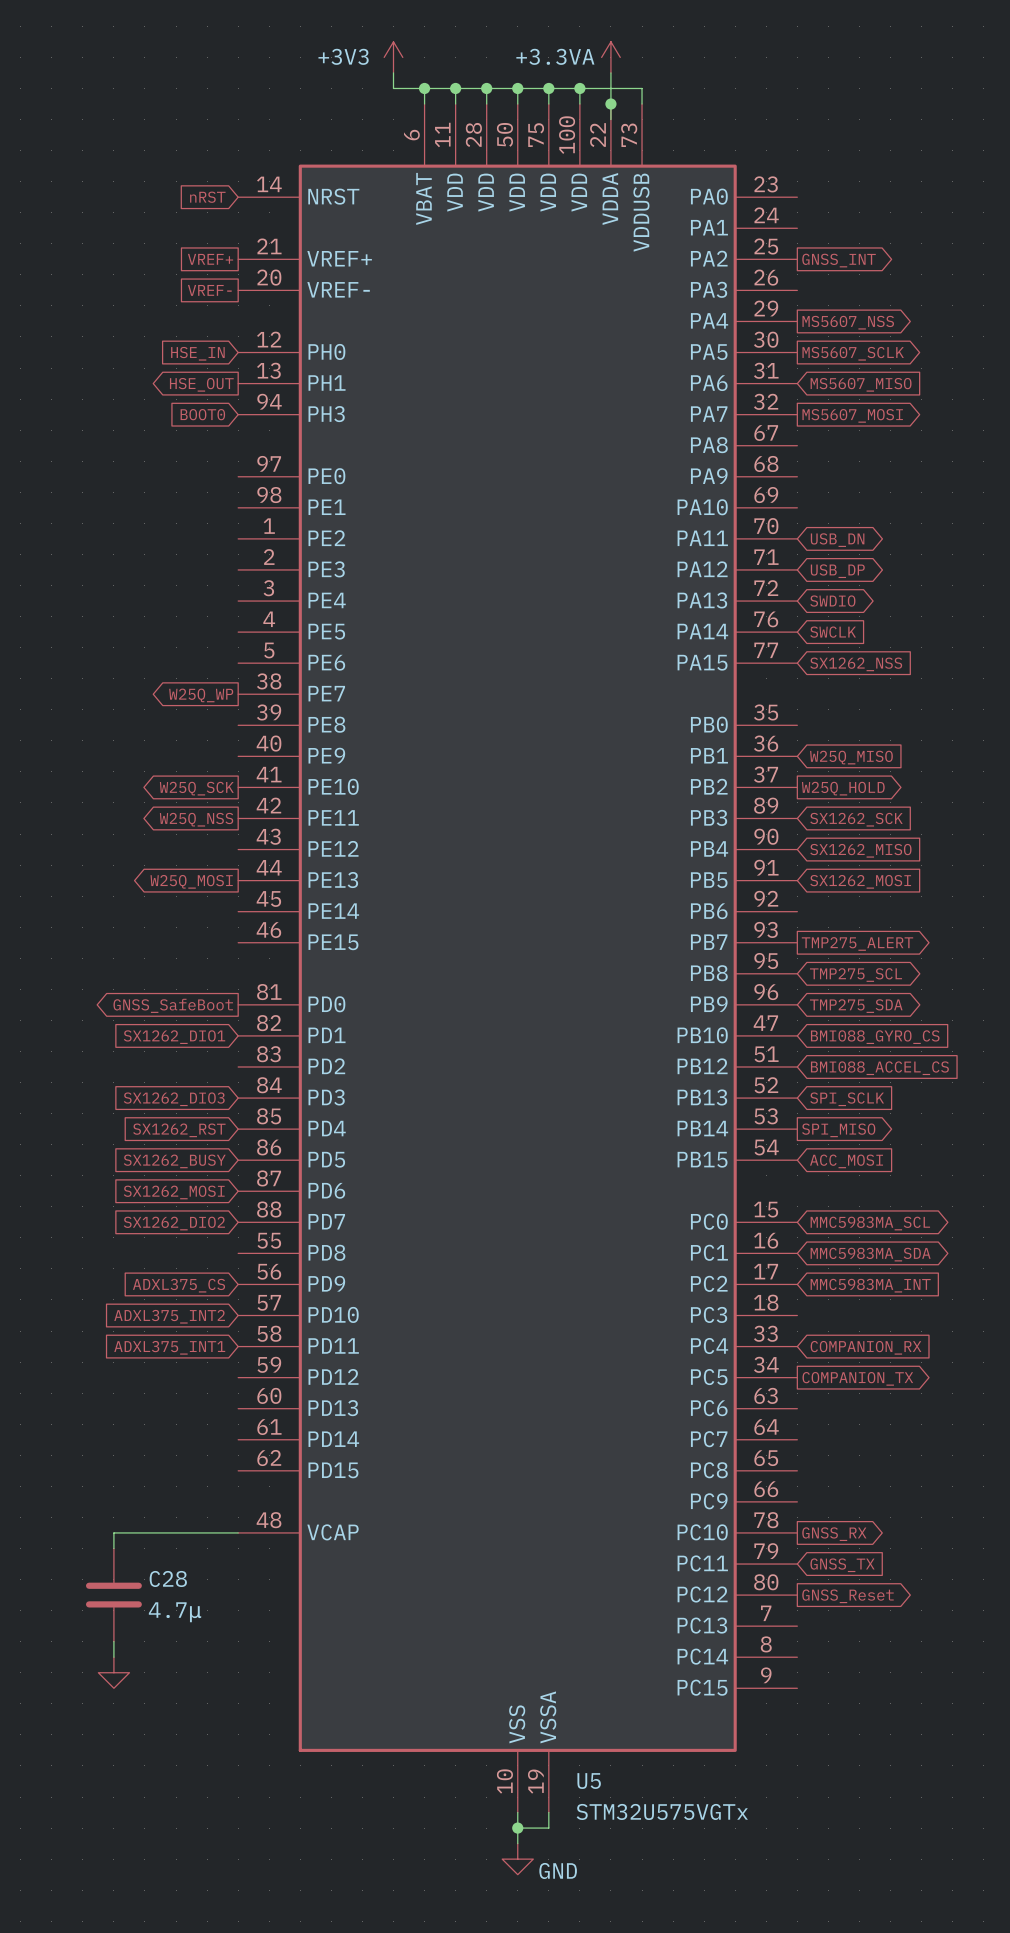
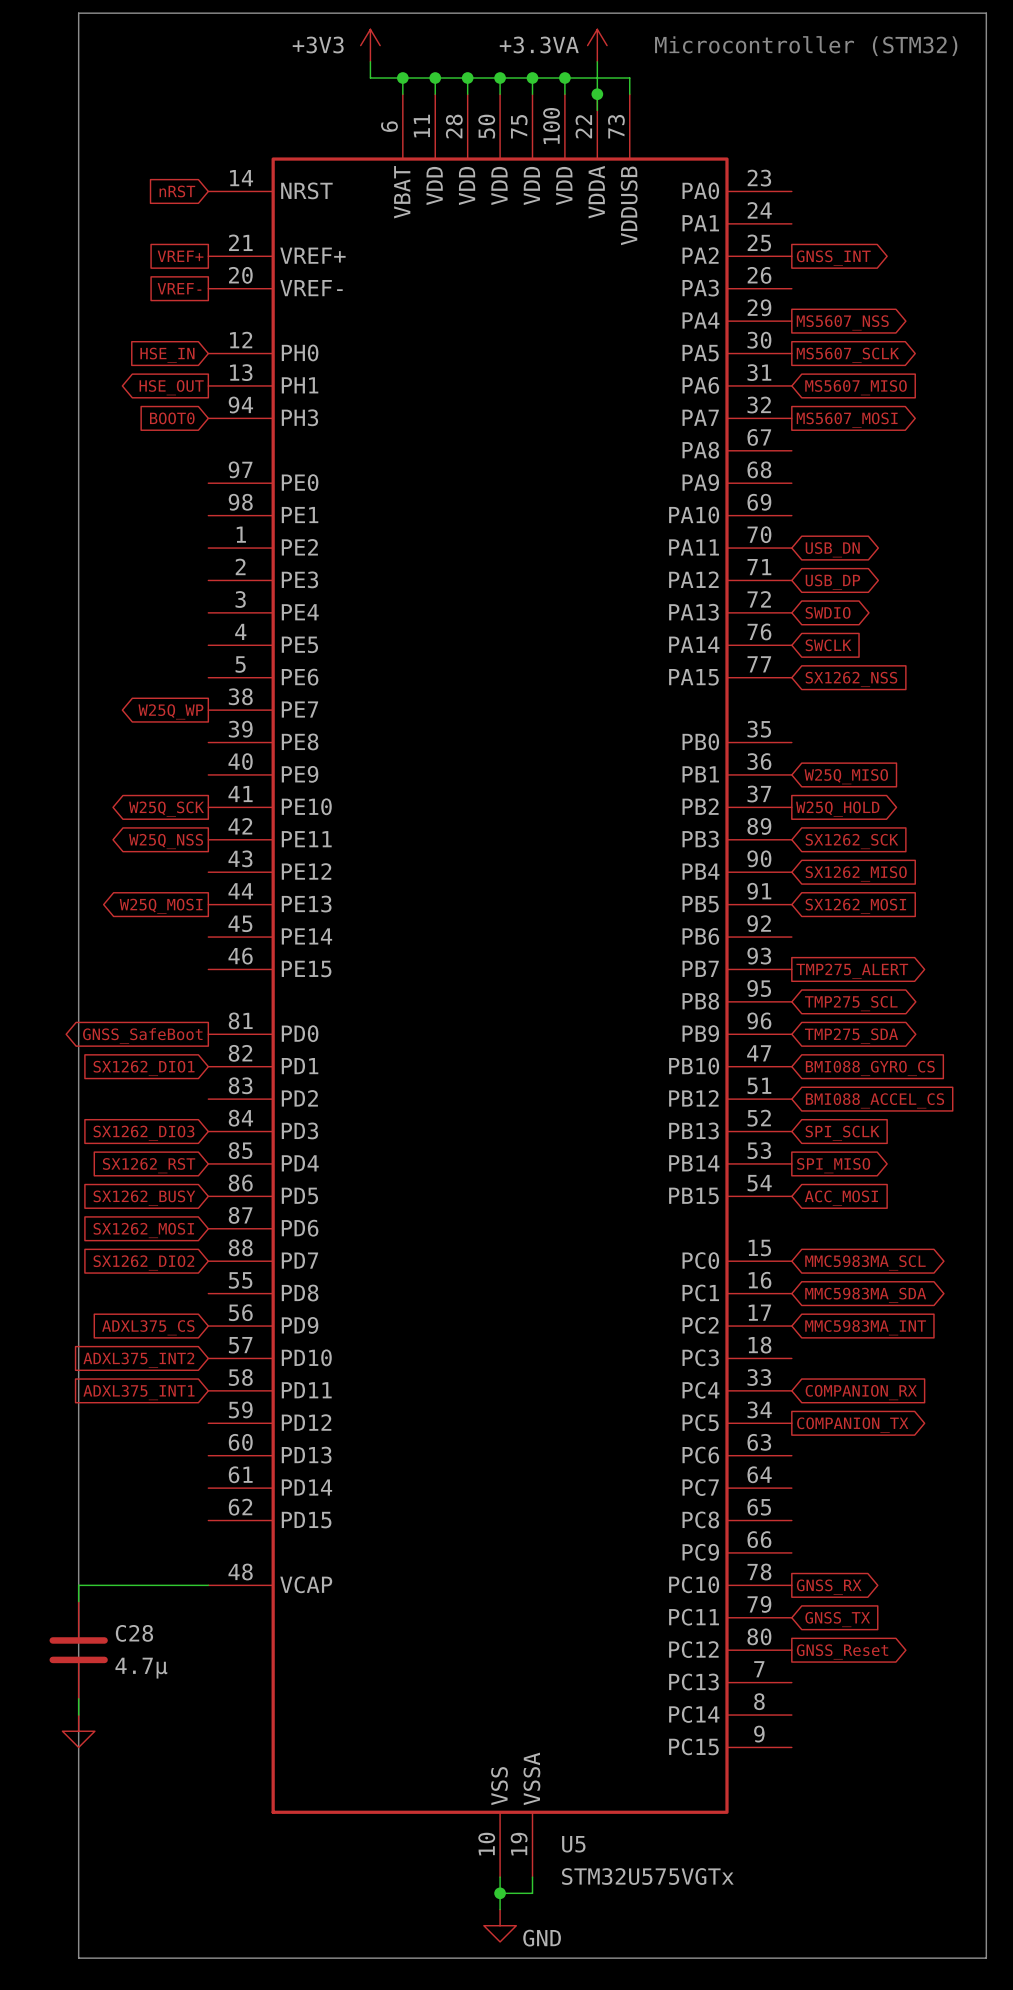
line: none -> (78, 13) (986, 13) (986, 1958) (78, 1958) (78, 13)
text: none -> Microcontroller (STM32) (806, 46)

